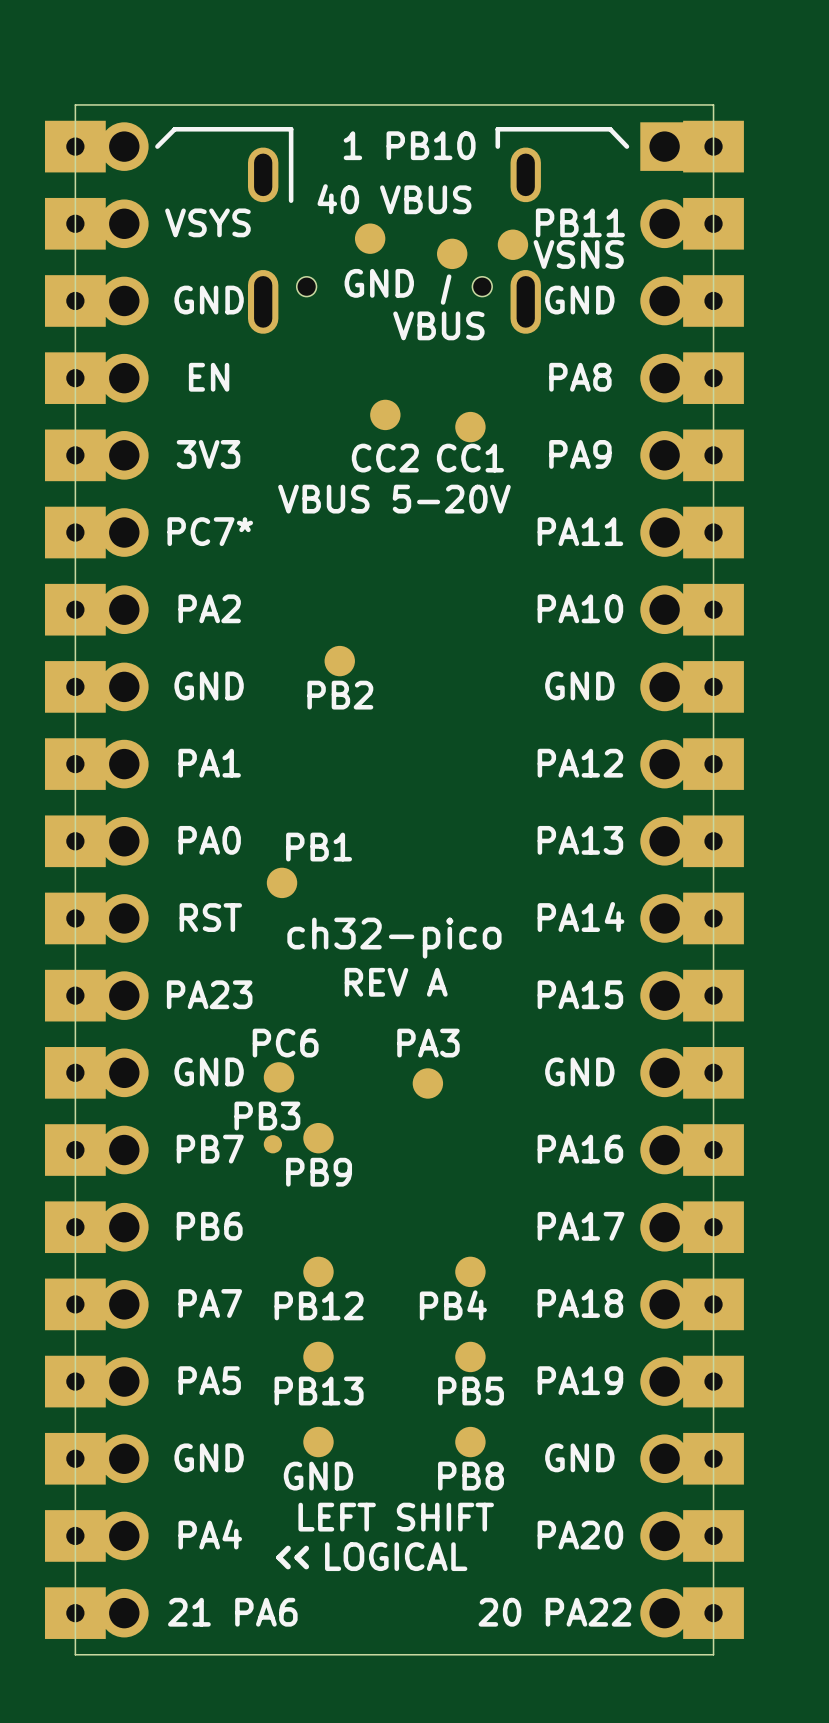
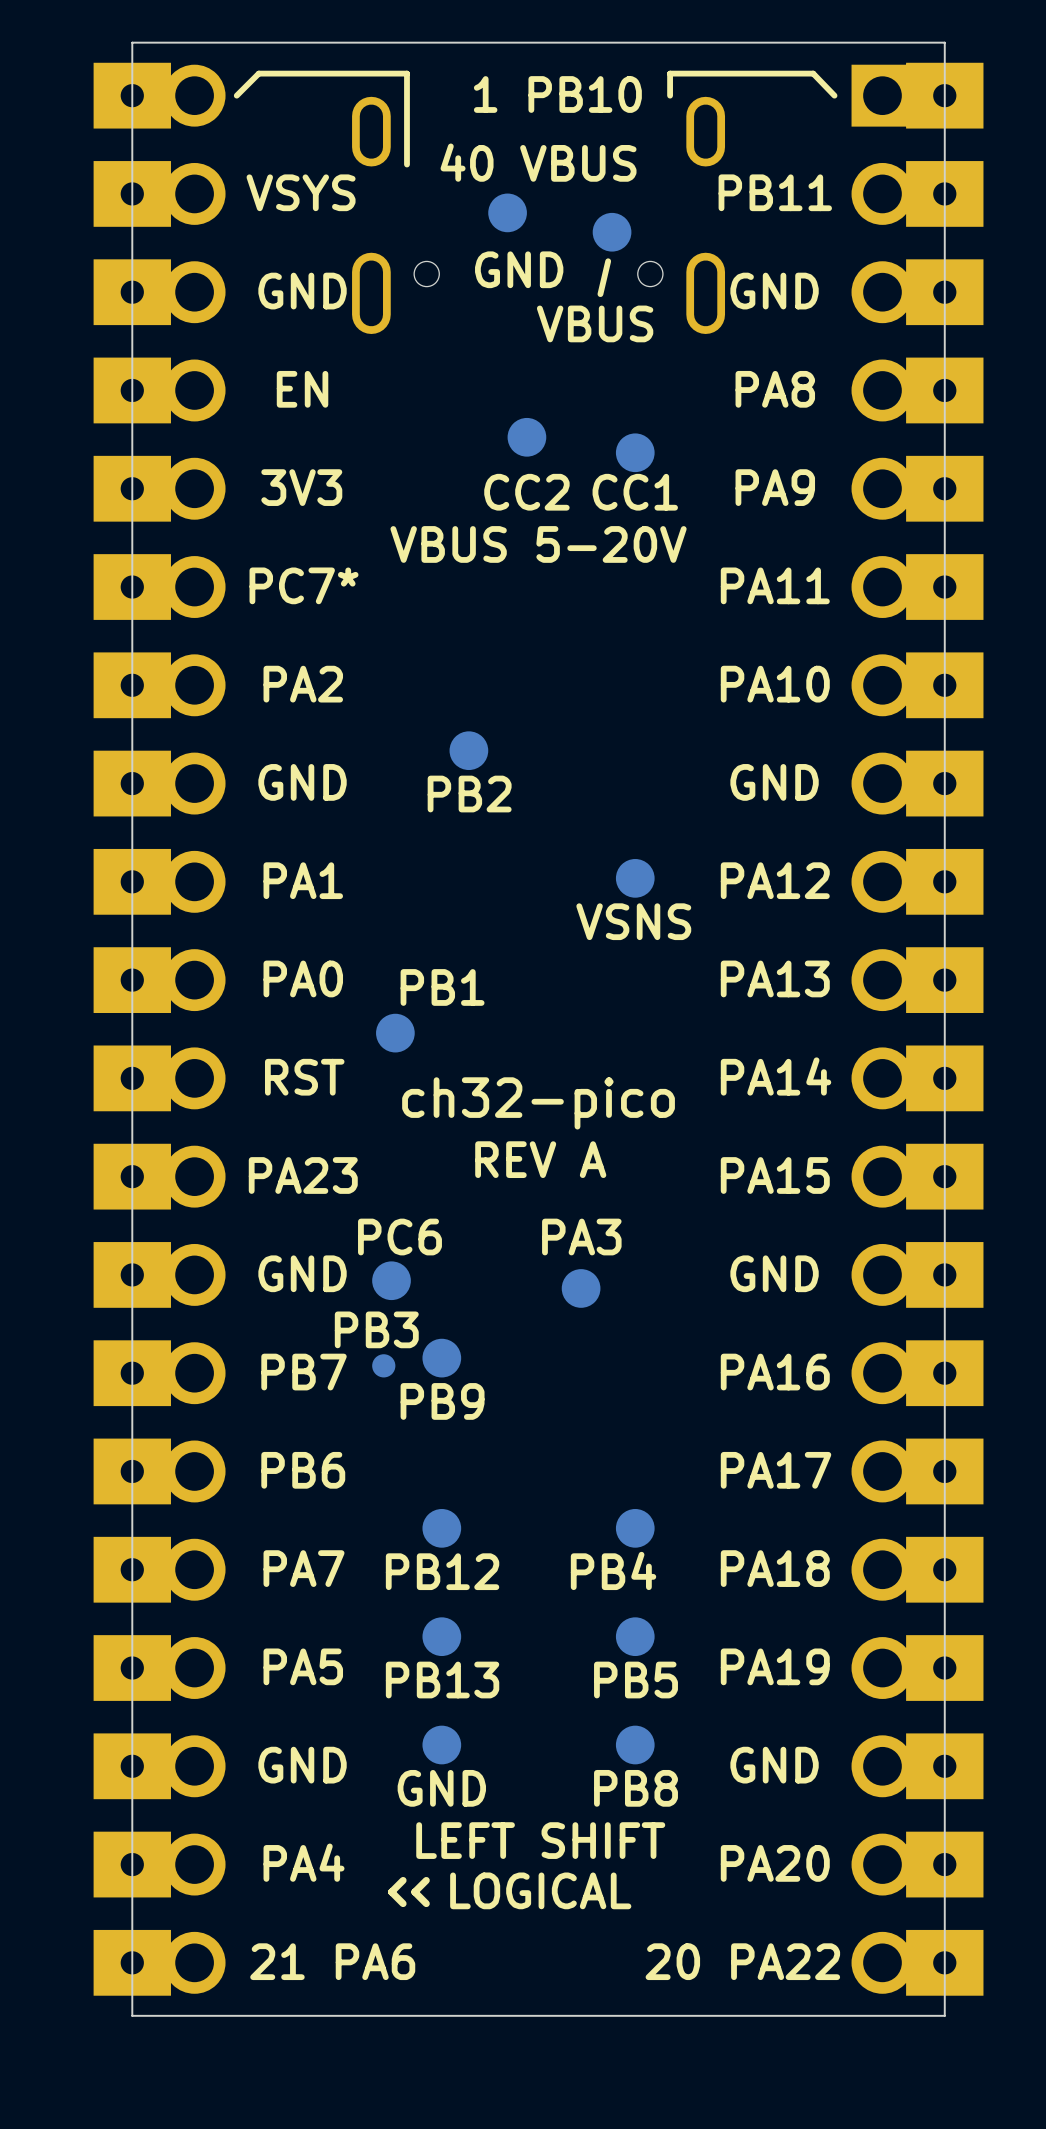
part position: (512, 244) -> (635, 878)
text position: VSNS (578, 254) -> VSNS (633, 921)

